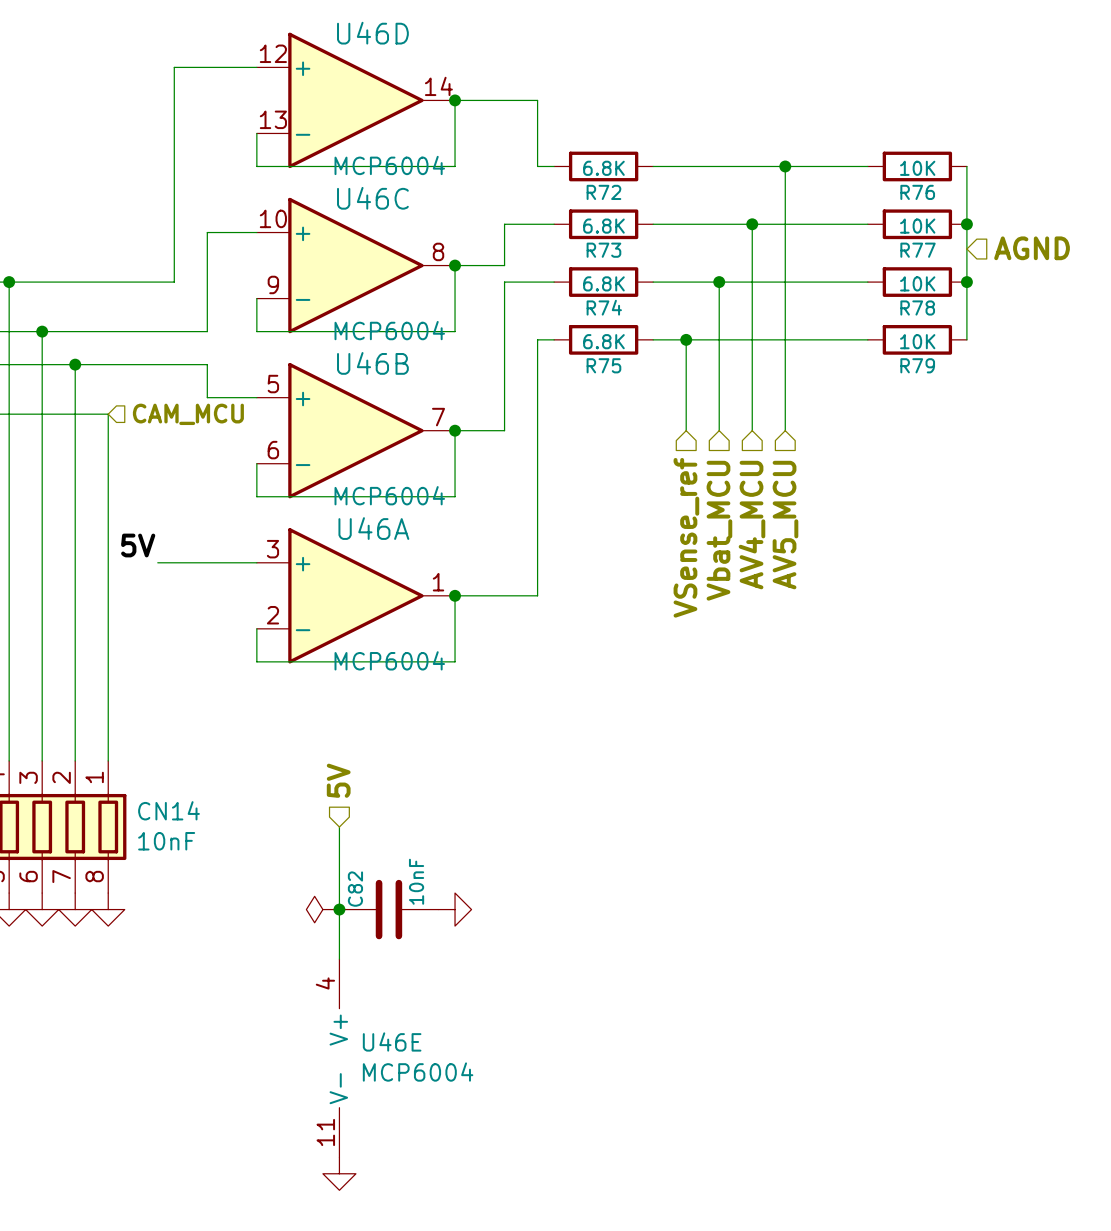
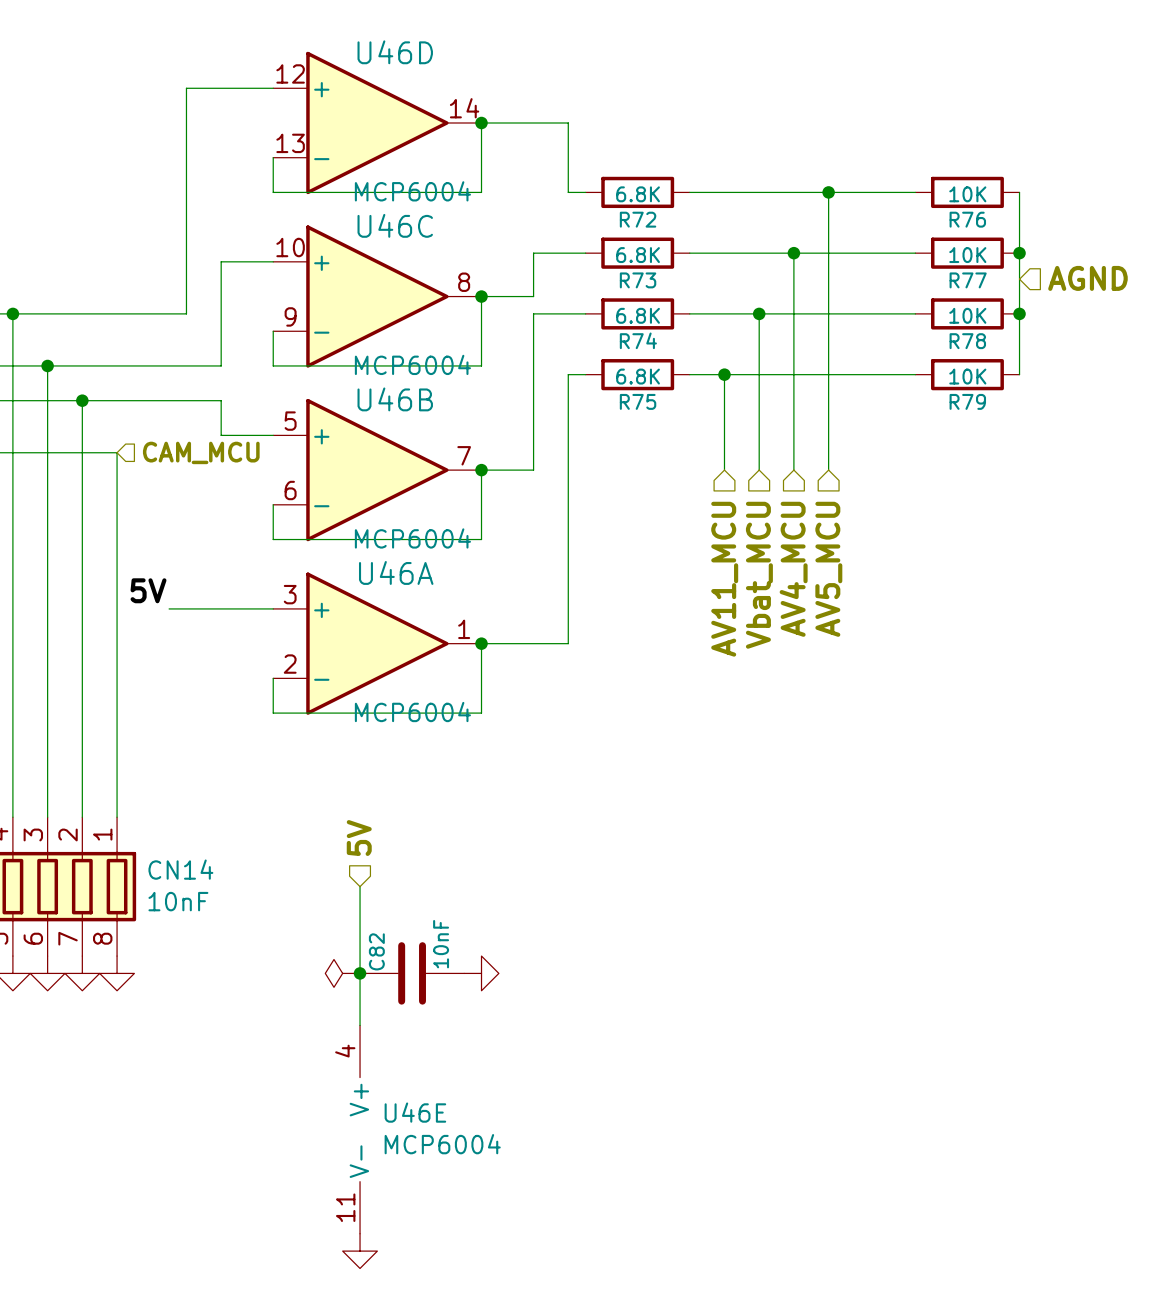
hierarchical label: VSense_ref (686, 537) -> AV11_MCU (724, 579)

